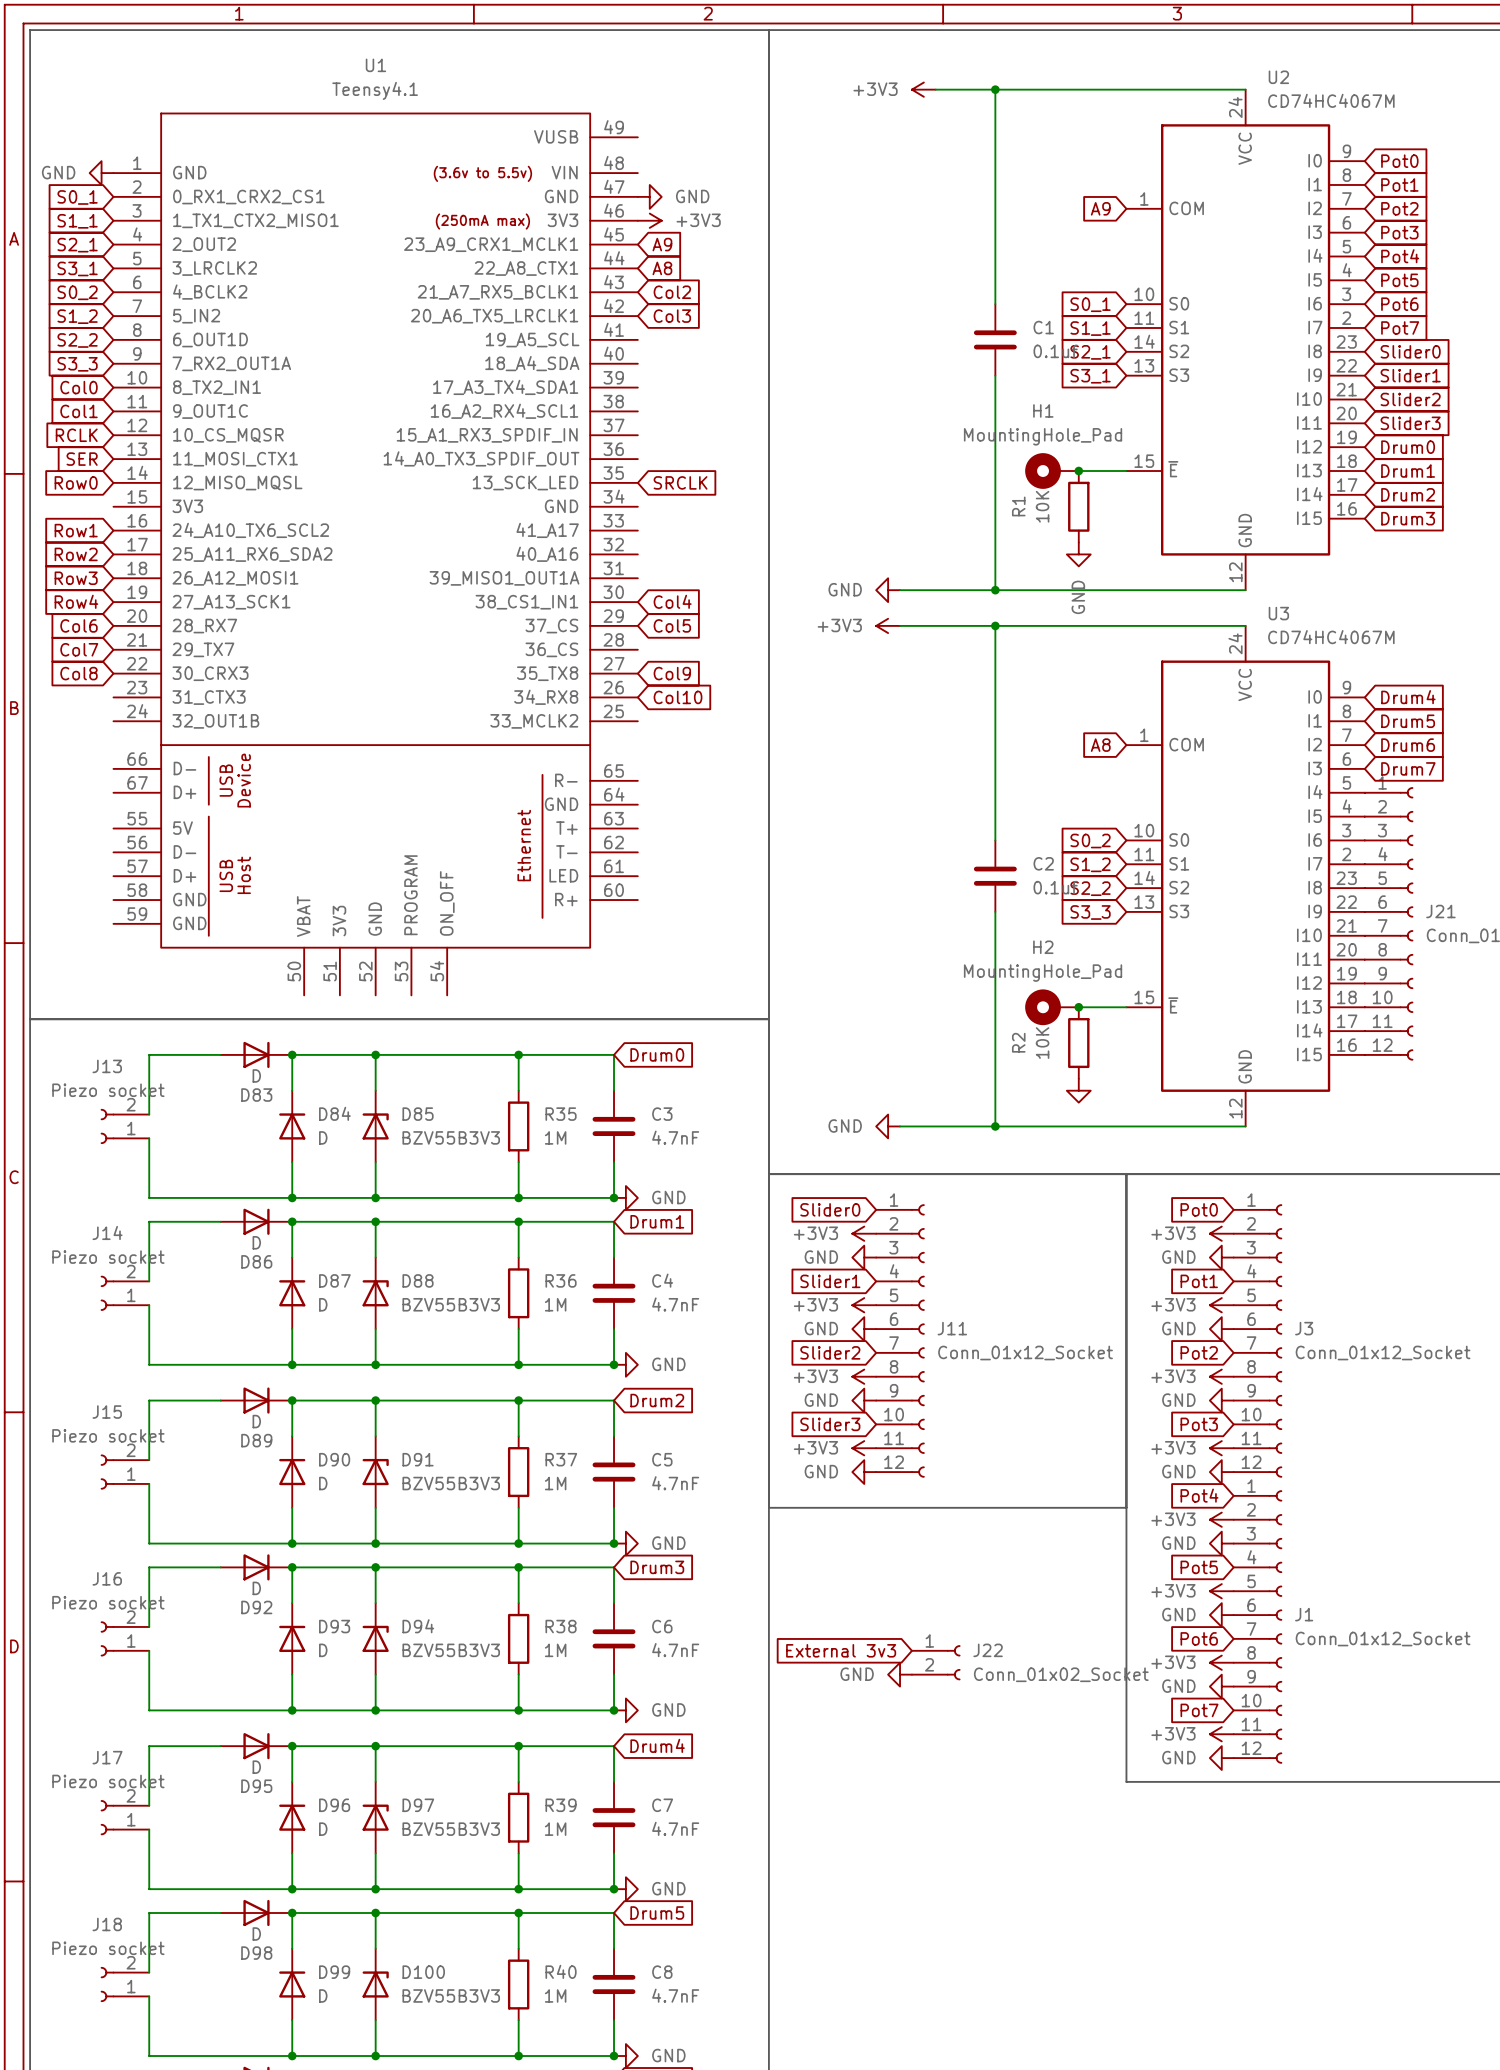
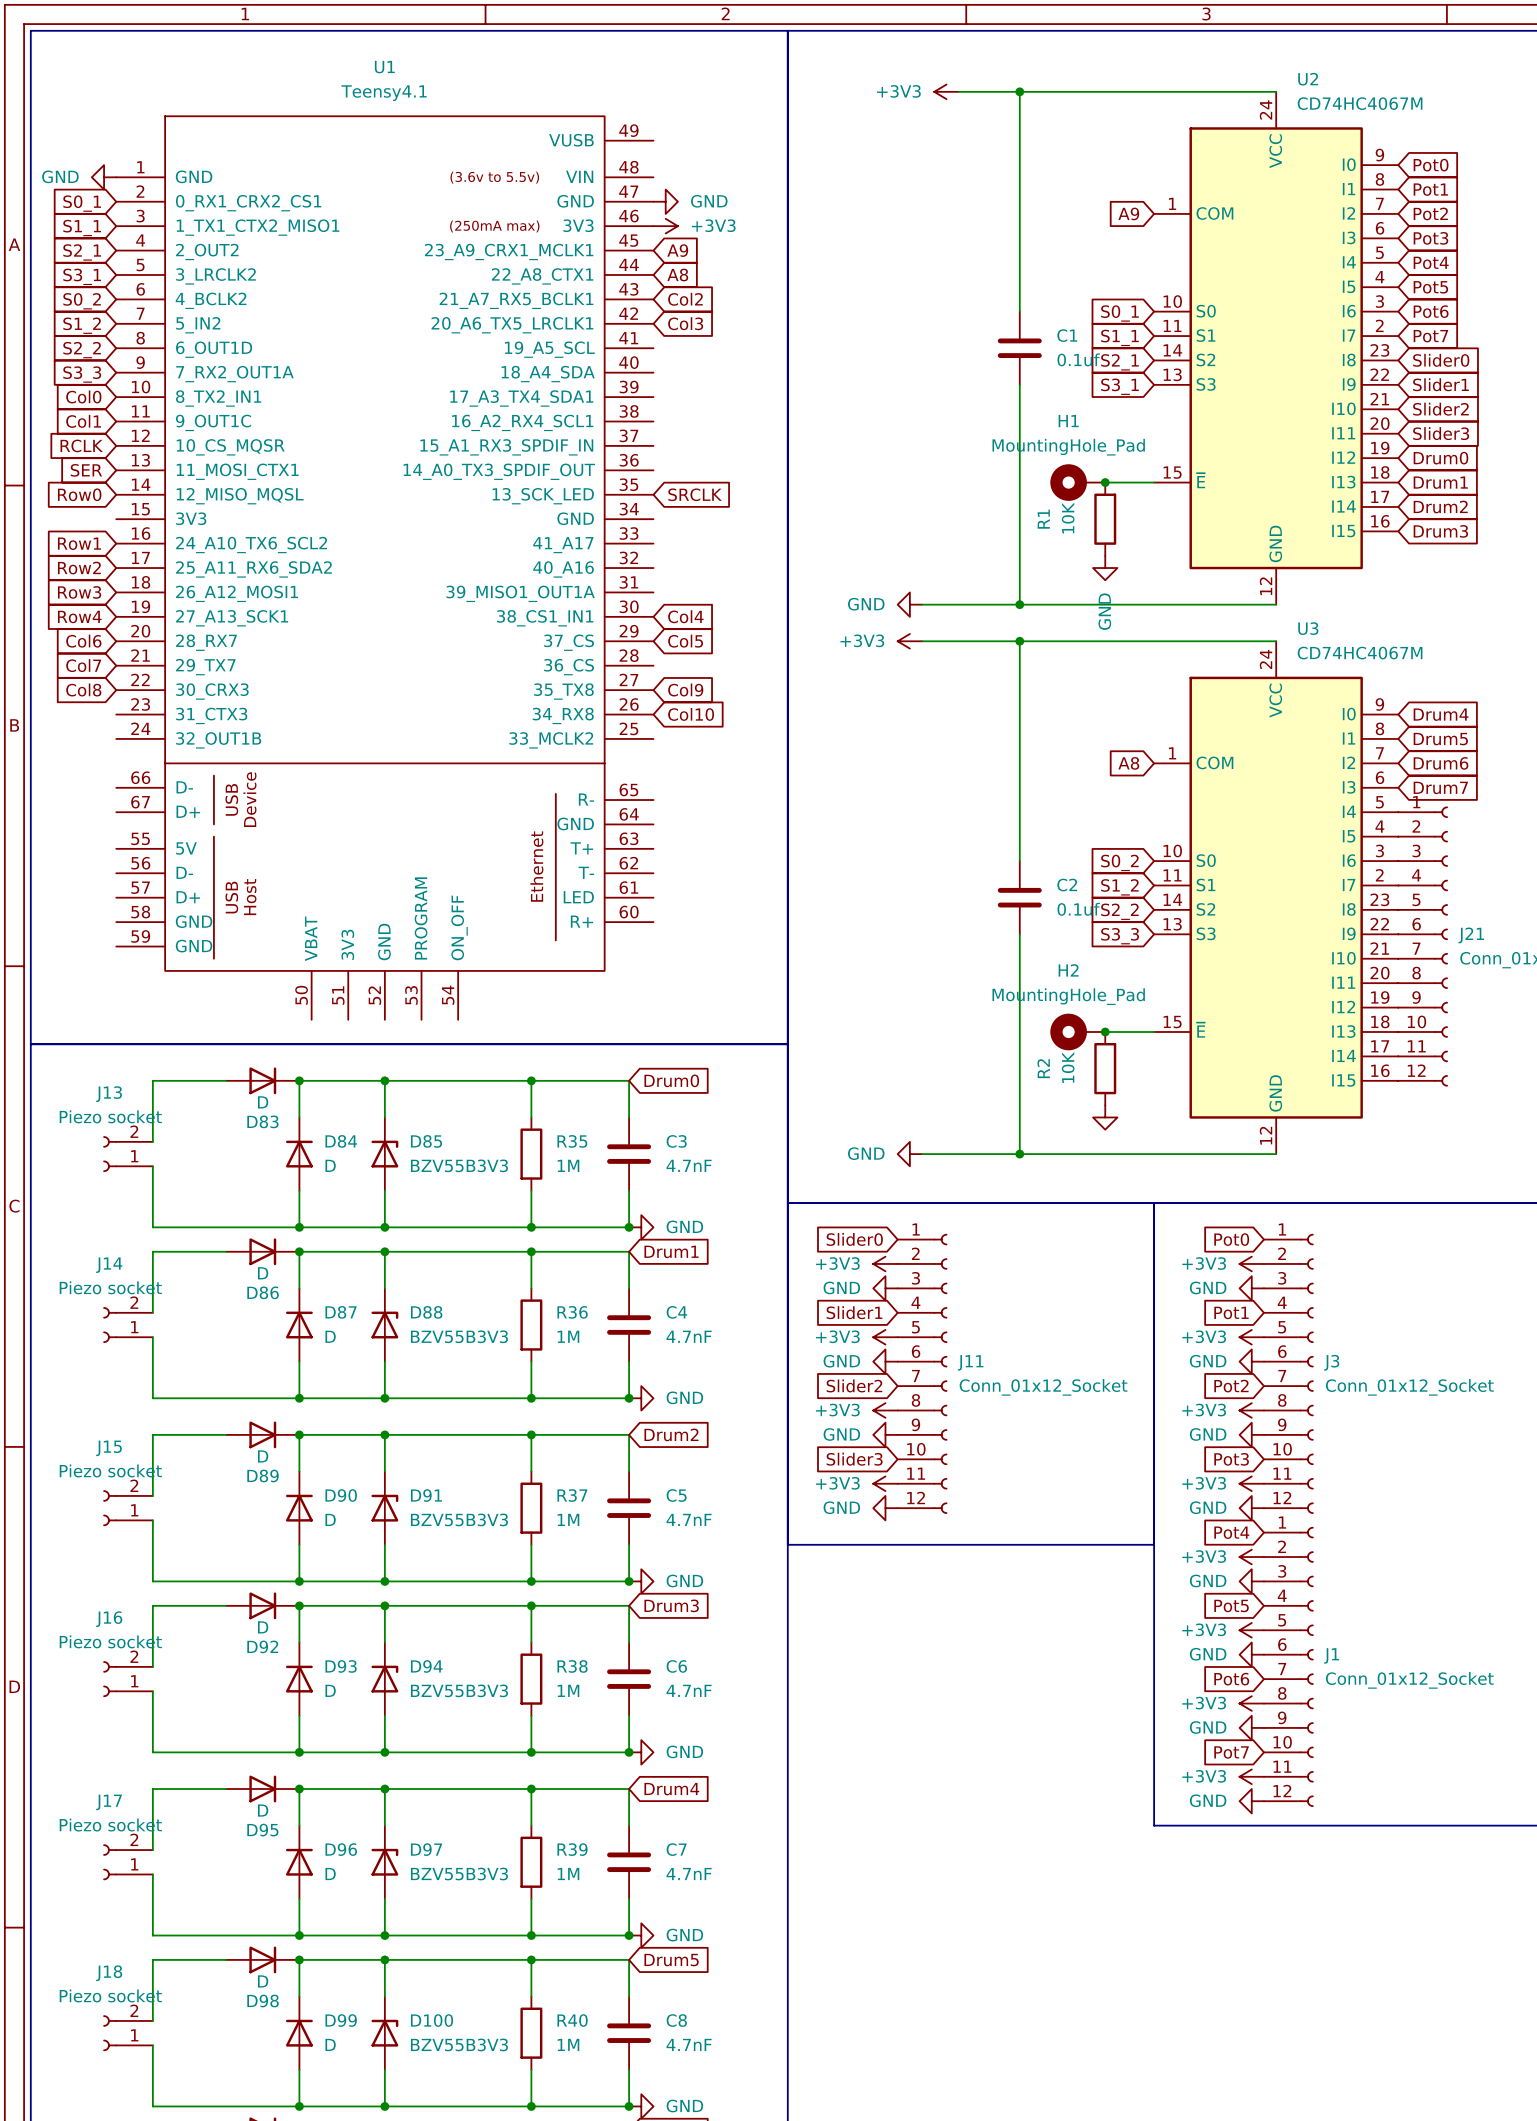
global label: External 3v3 (841, 1650) -> none
J22: Conn_01x02_Socket (936, 1662) -> none
power symbol: GND (900, 1674) -> none

